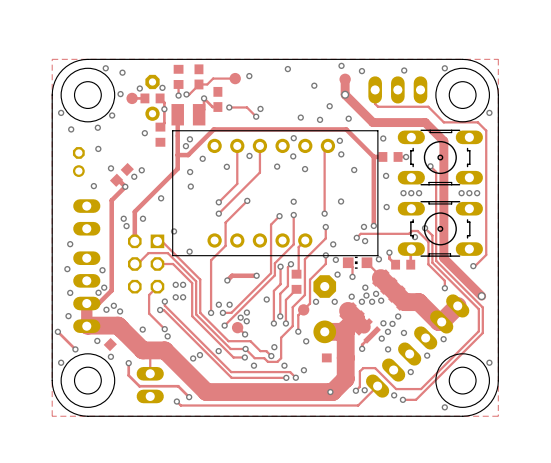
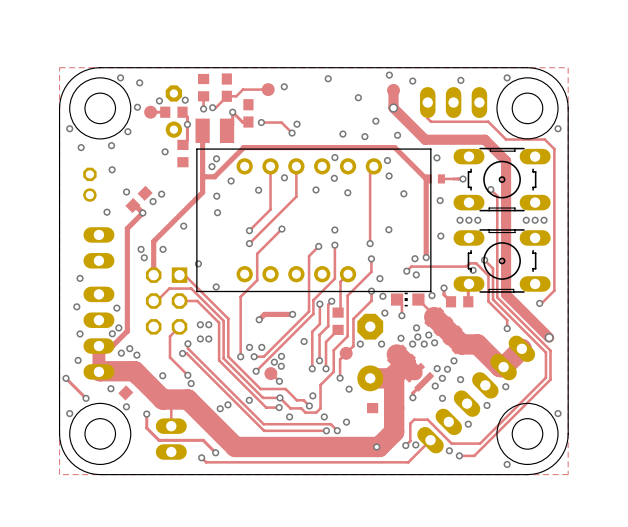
part: none -> (434, 178)
track: none -> (441, 178) (453, 178)
part: (390, 156) -> none

